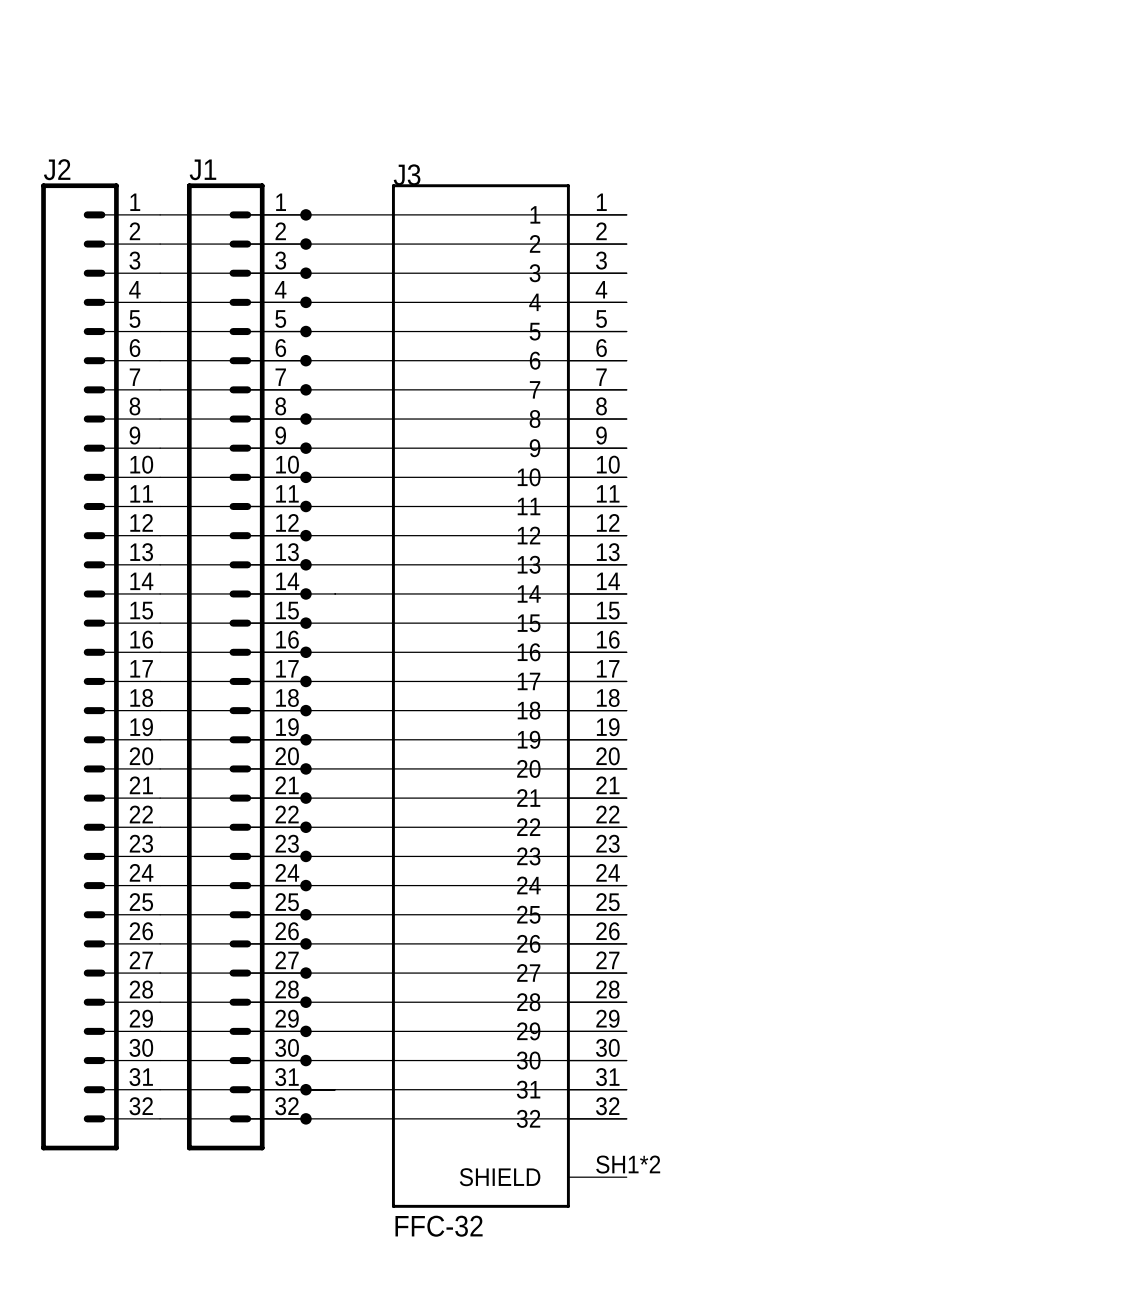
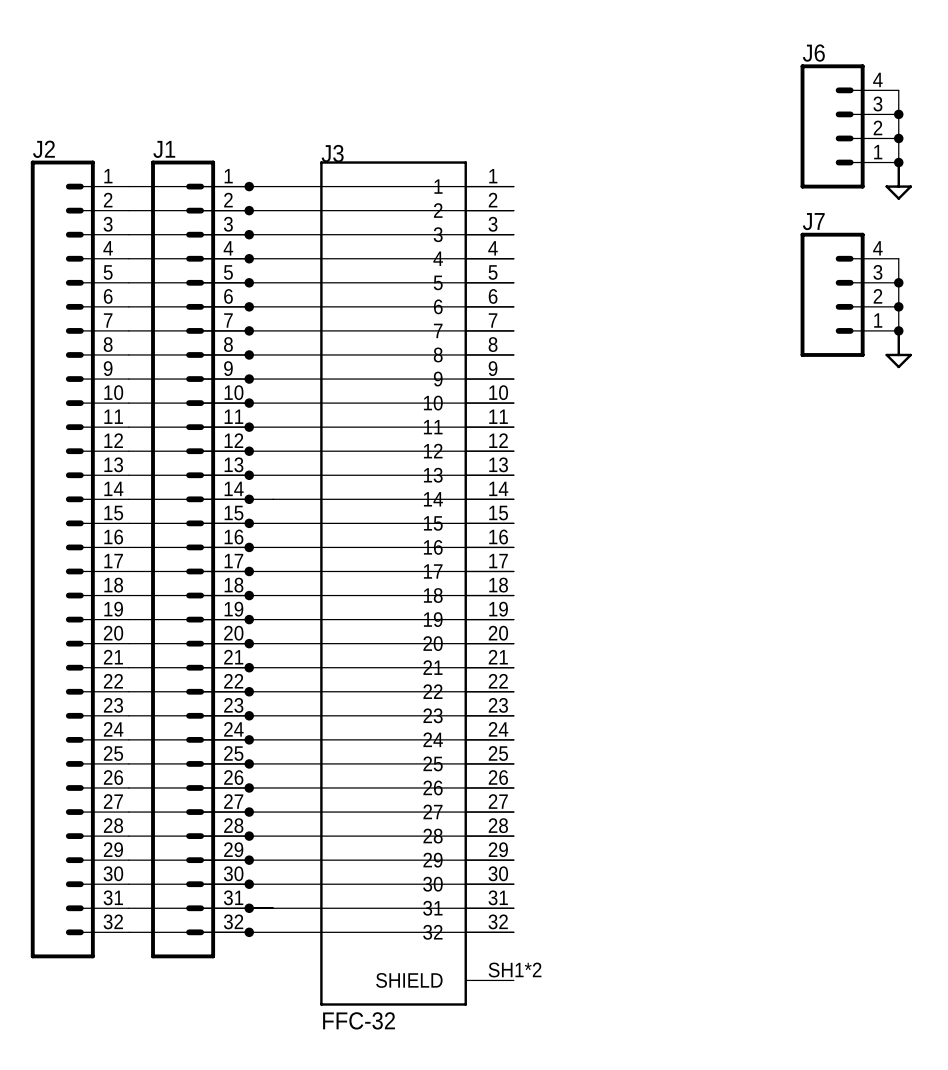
wire: none -> (898, 90) (898, 162)
junction: none -> (898, 114)
J6: none -> (849, 126)
junction: none -> (898, 138)
junction: none -> (898, 162)
power symbol: none -> (898, 180)
wire: none -> (898, 258) (898, 330)
junction: none -> (898, 282)
J7: none -> (849, 294)
junction: none -> (898, 306)
junction: none -> (898, 330)
power symbol: none -> (898, 348)

